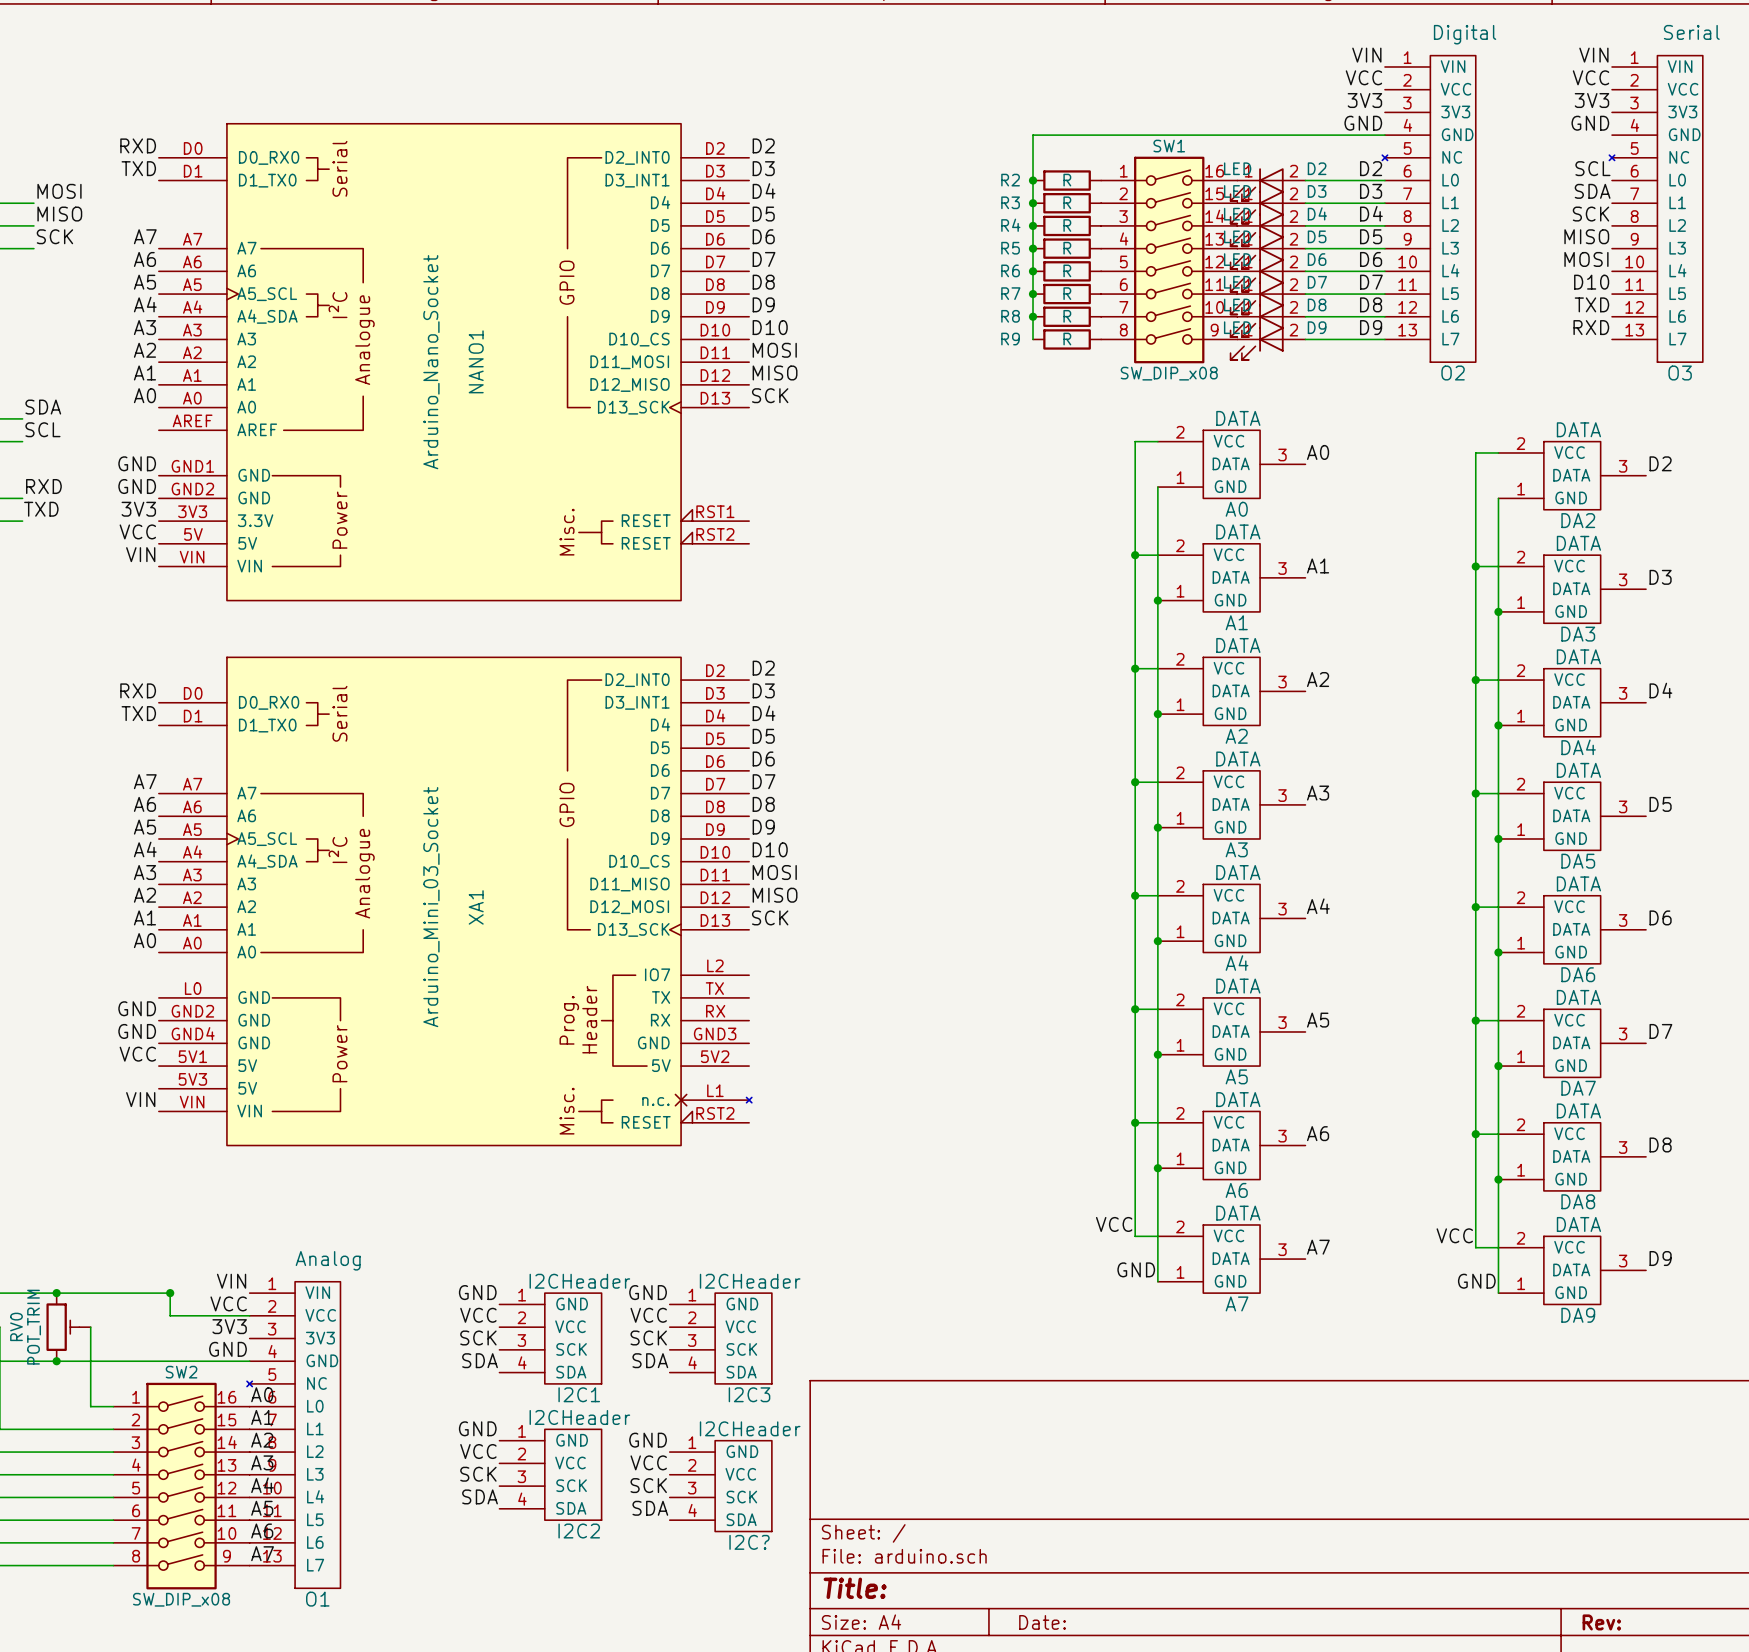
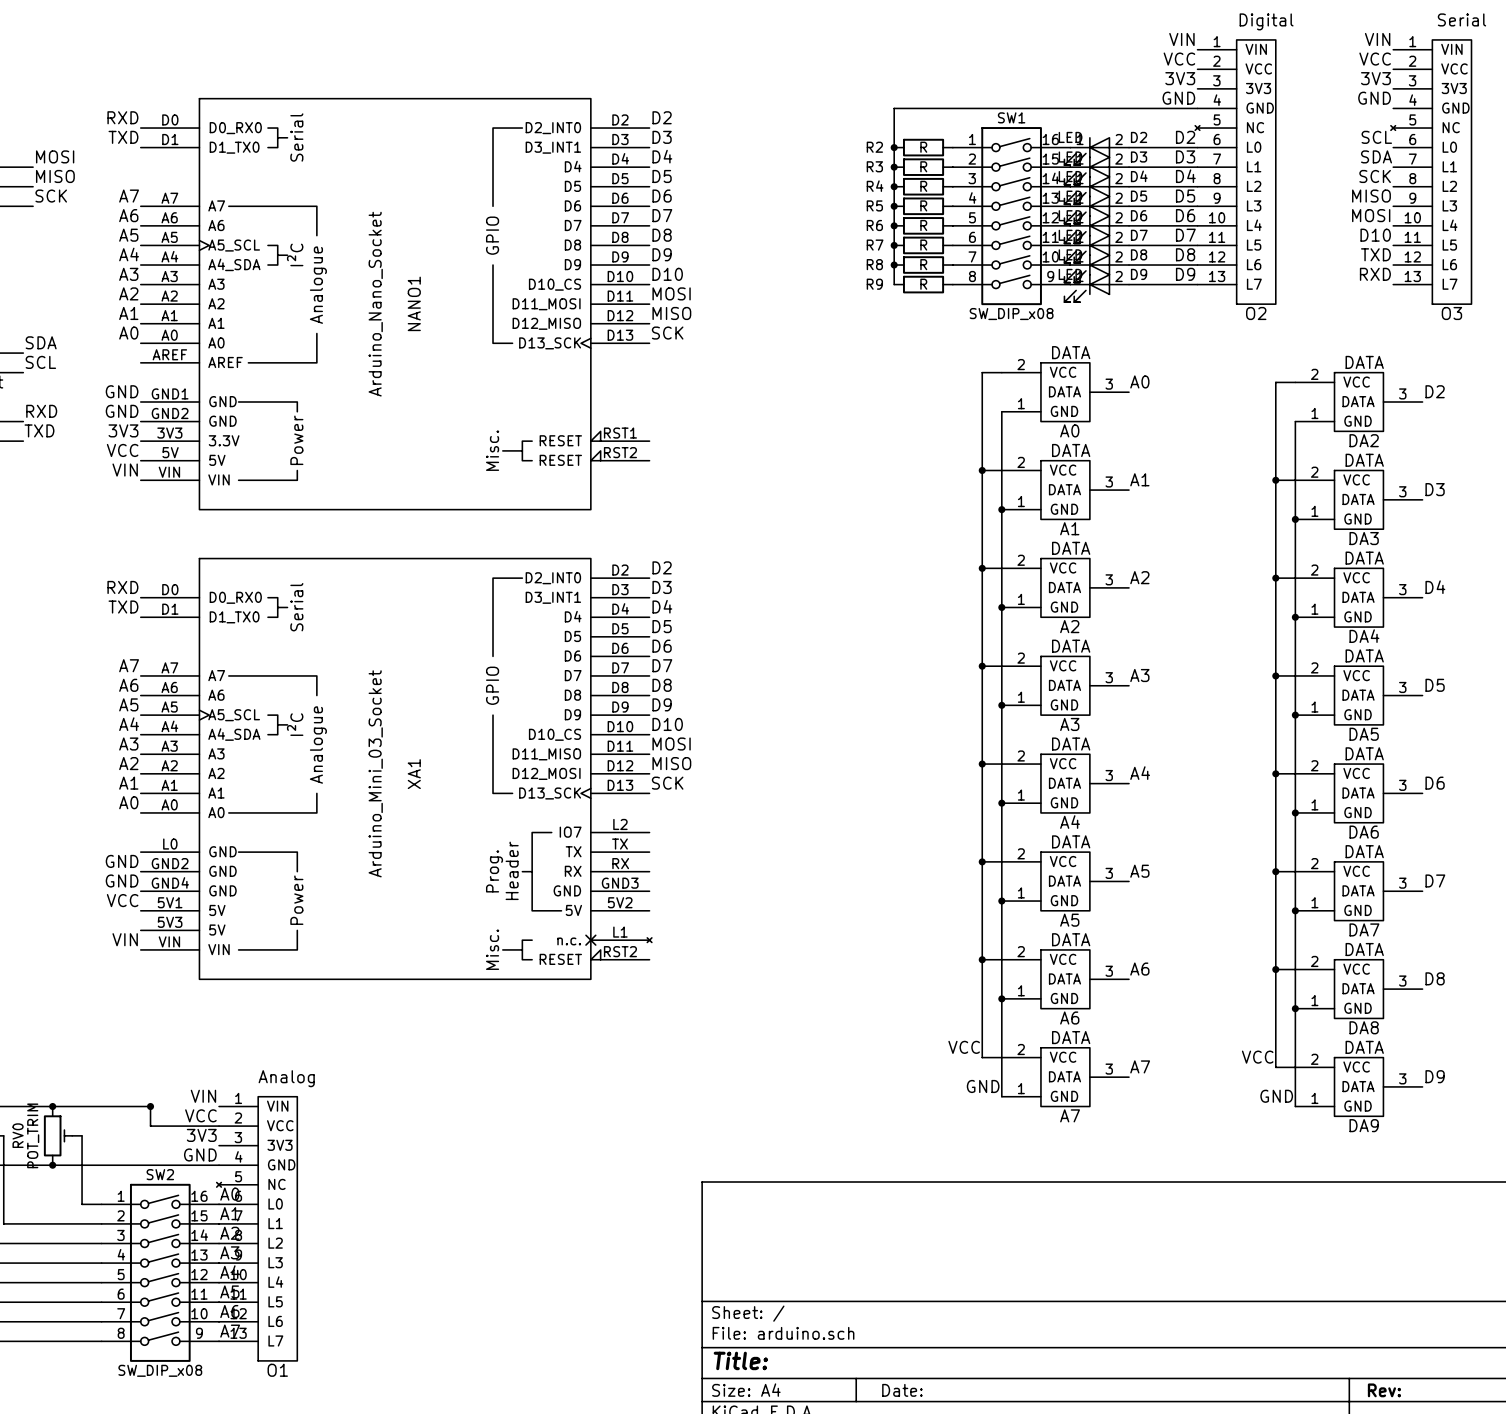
label: GND (477, 1292) -> none
label: GND (648, 1292) -> none
label: VCC (478, 1315) -> none
label: VCC (648, 1315) -> none
label: SCK (478, 1337) -> none
label: SCK (648, 1337) -> none
I2C1: I2CHeader (550, 1338) -> none
I2C3: I2CHeader (720, 1338) -> none
label: SDA (480, 1360) -> none
label: SDA (650, 1360) -> none
label: GND (477, 1428) -> none
label: GND (648, 1440) -> none
label: VCC (478, 1451) -> none
label: VCC (648, 1462) -> none
label: SCK (478, 1474) -> none
I2C2: I2CHeader (550, 1474) -> none
label: SCK (648, 1485) -> none
I2C?: I2CHeader (720, 1486) -> none
label: SDA (480, 1496) -> none
label: SDA (650, 1508) -> none

